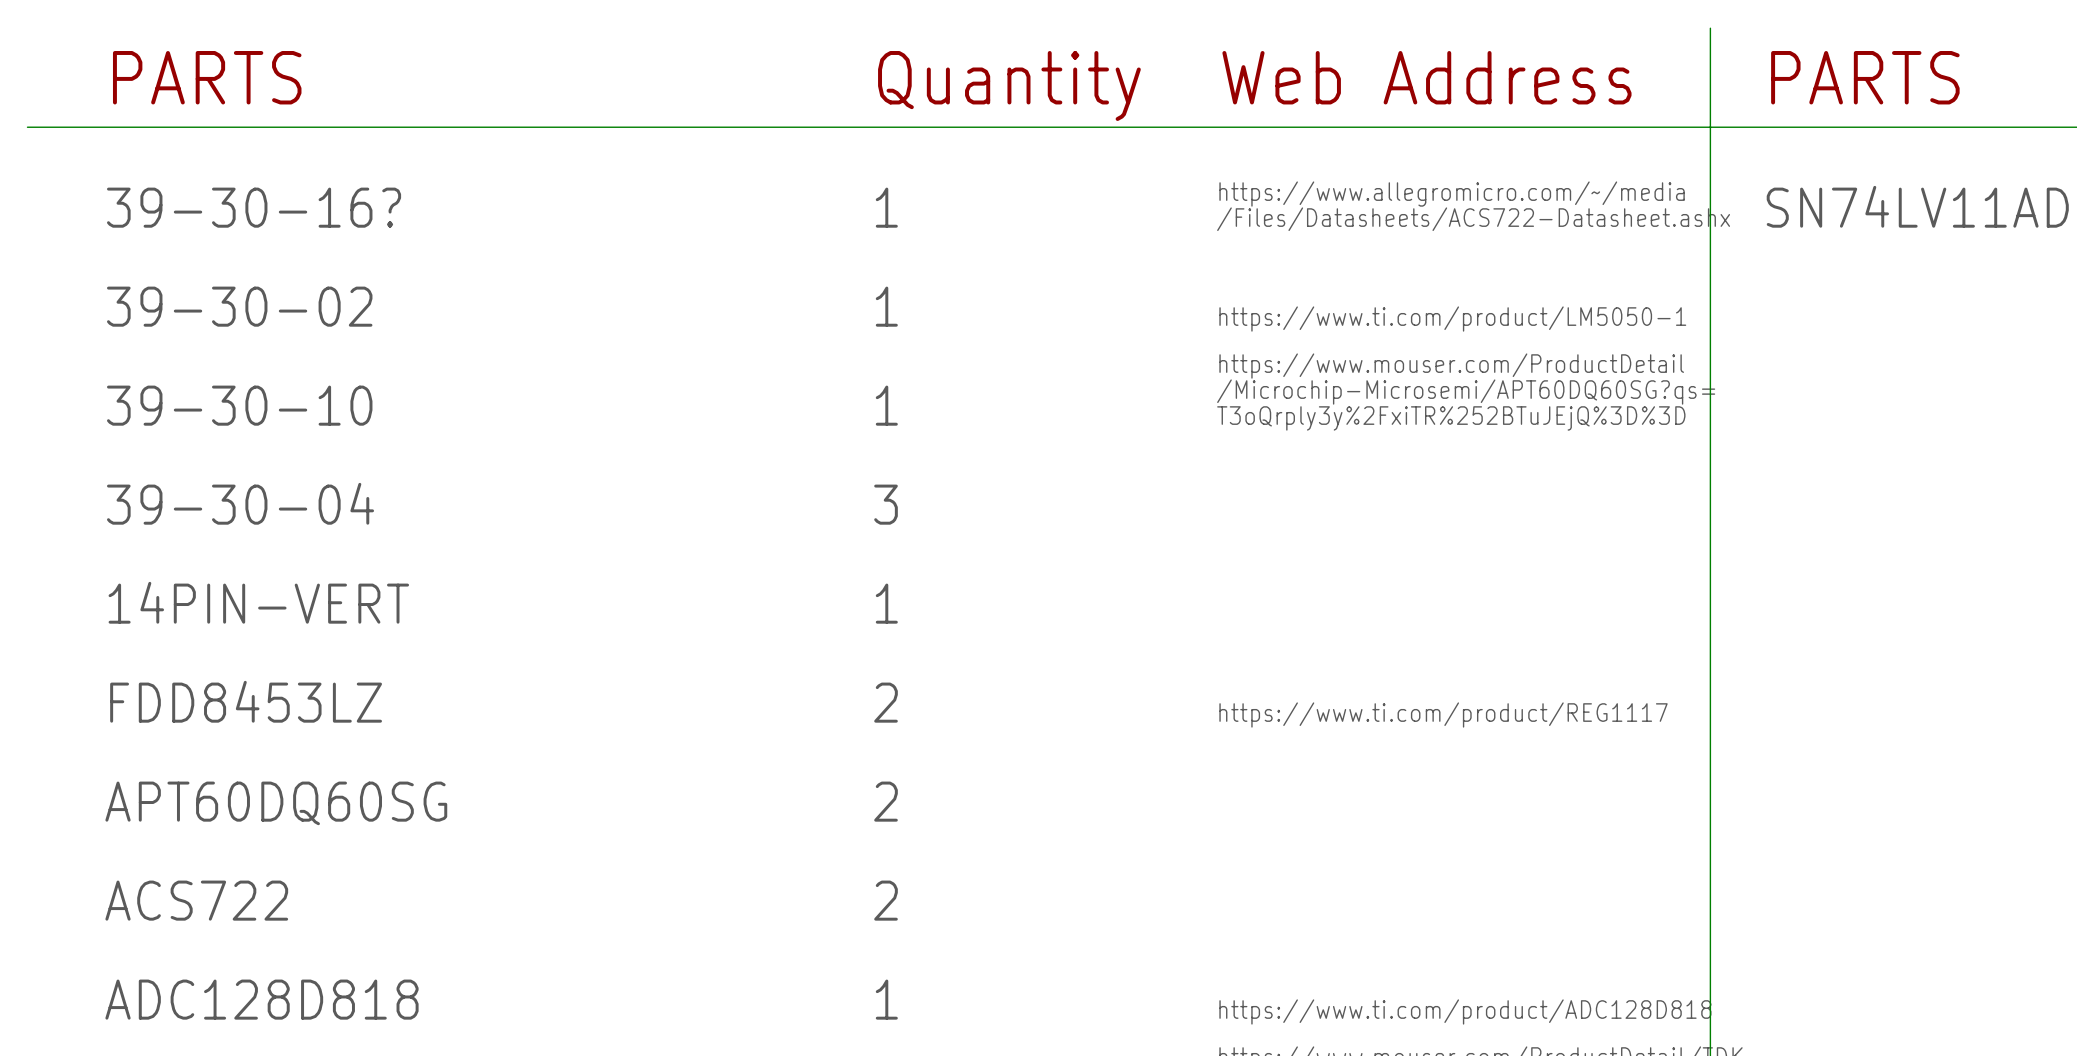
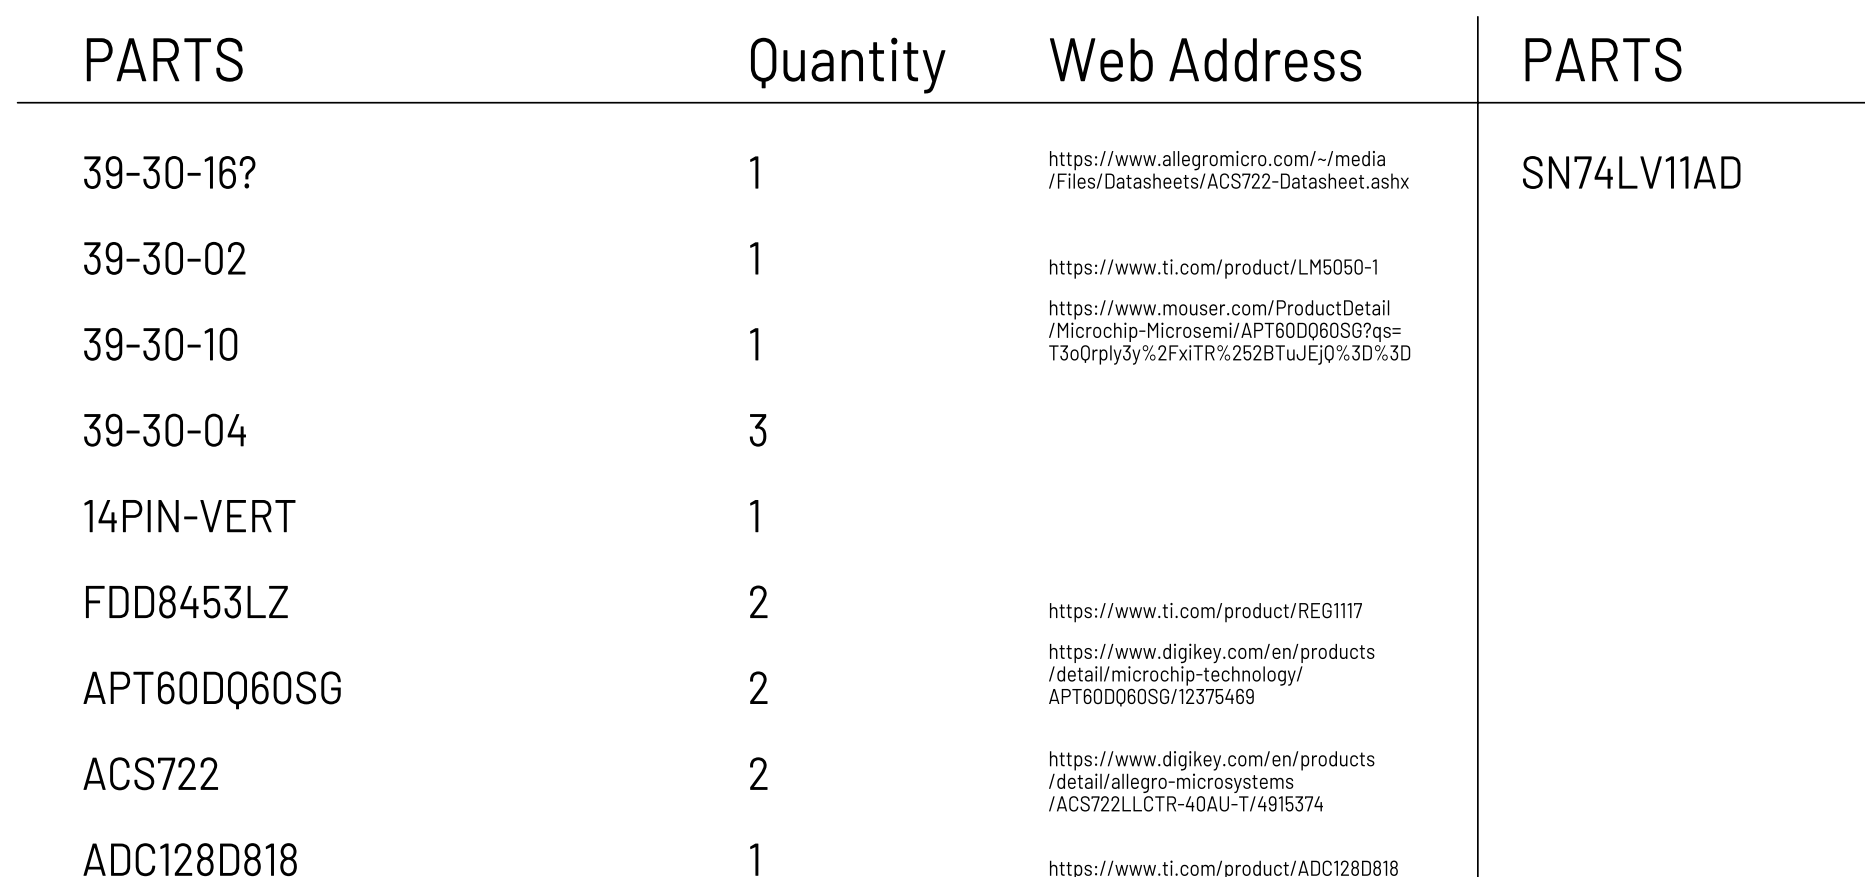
text: none -> https://www.digikey.com/en/products (1212, 653)
text: none -> /detail/microchip-technology/ (1175, 675)
text: none -> APT60DQ60SG/12375469 (1151, 697)
text: none -> https://www.digikey.com/en/products (1212, 760)
text: none -> /detail/allegro-microsystems (1171, 783)
text: none -> /ACS722LLCTR-40AU-T/4915374 (1185, 803)

